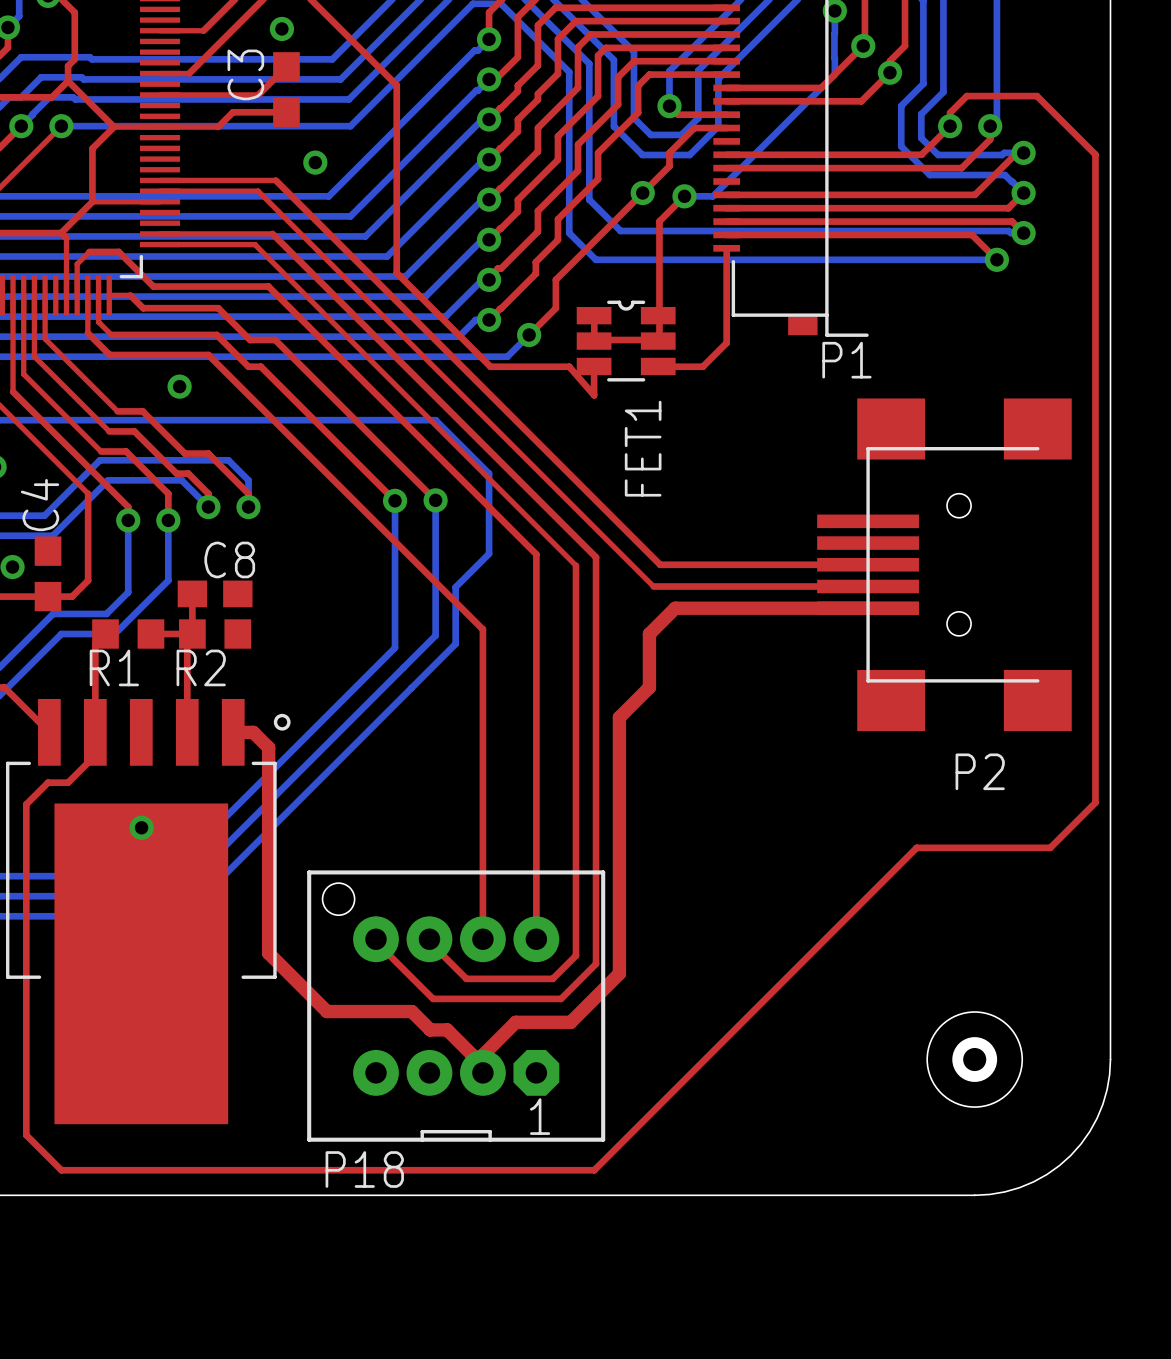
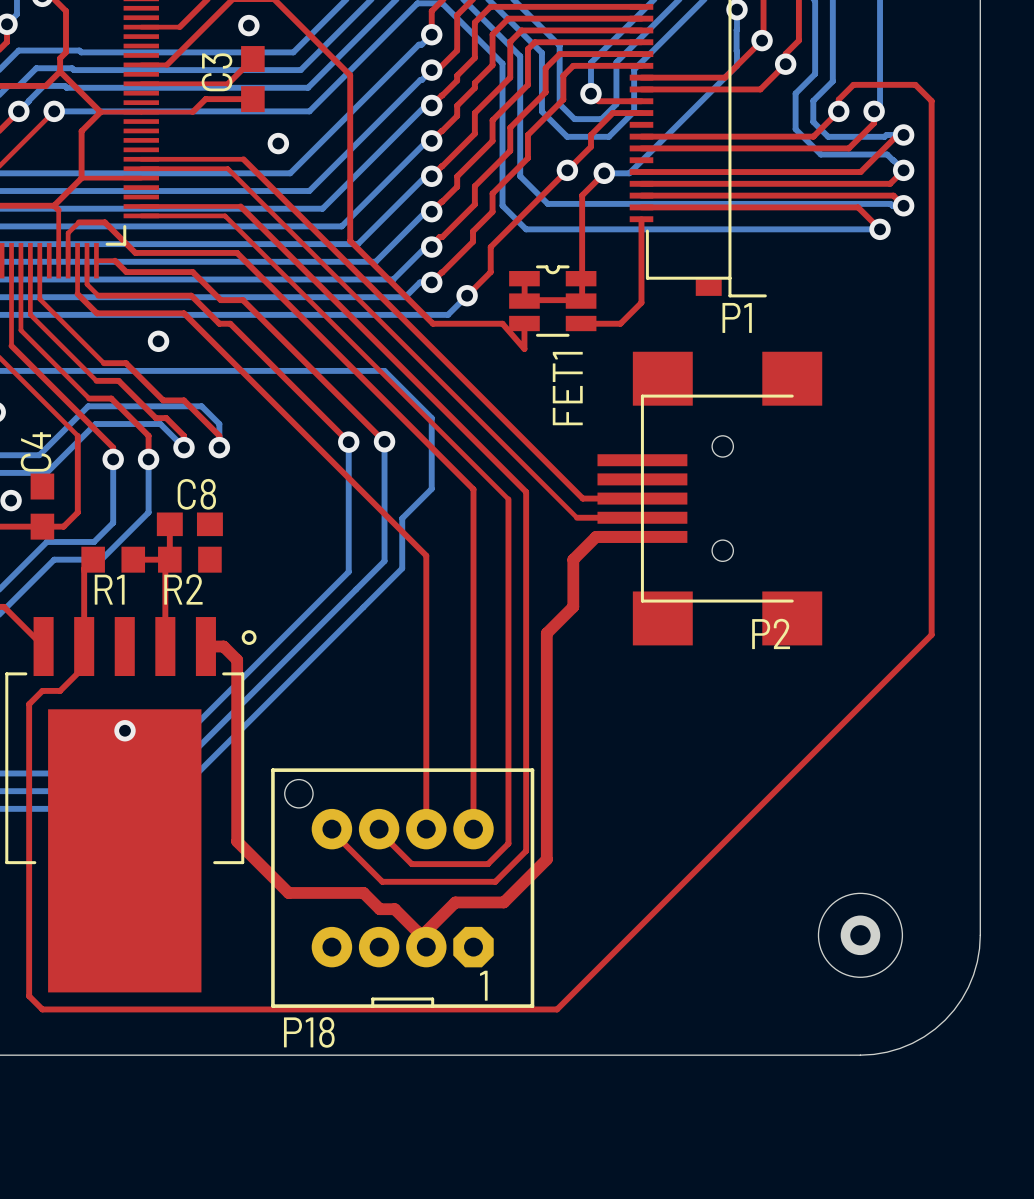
top track: (1055, 114) (1095, 154) (1095, 802) (1050, 847) (916, 847) (594, 1170) (61, 1170) (26, 1135) (26, 804) (33, 797) -> (931, 101) (931, 634) (557, 1009) (42, 1009) (29, 996) (29, 704)
top track: (727, 564) (868, 564) -> none
P2 position: (944, 564) -> (709, 498)
top track: (727, 586) (868, 586) -> none
top track: (727, 608) (868, 608) -> none
P2 name position: P2 (980, 771) -> P2 (771, 633)

